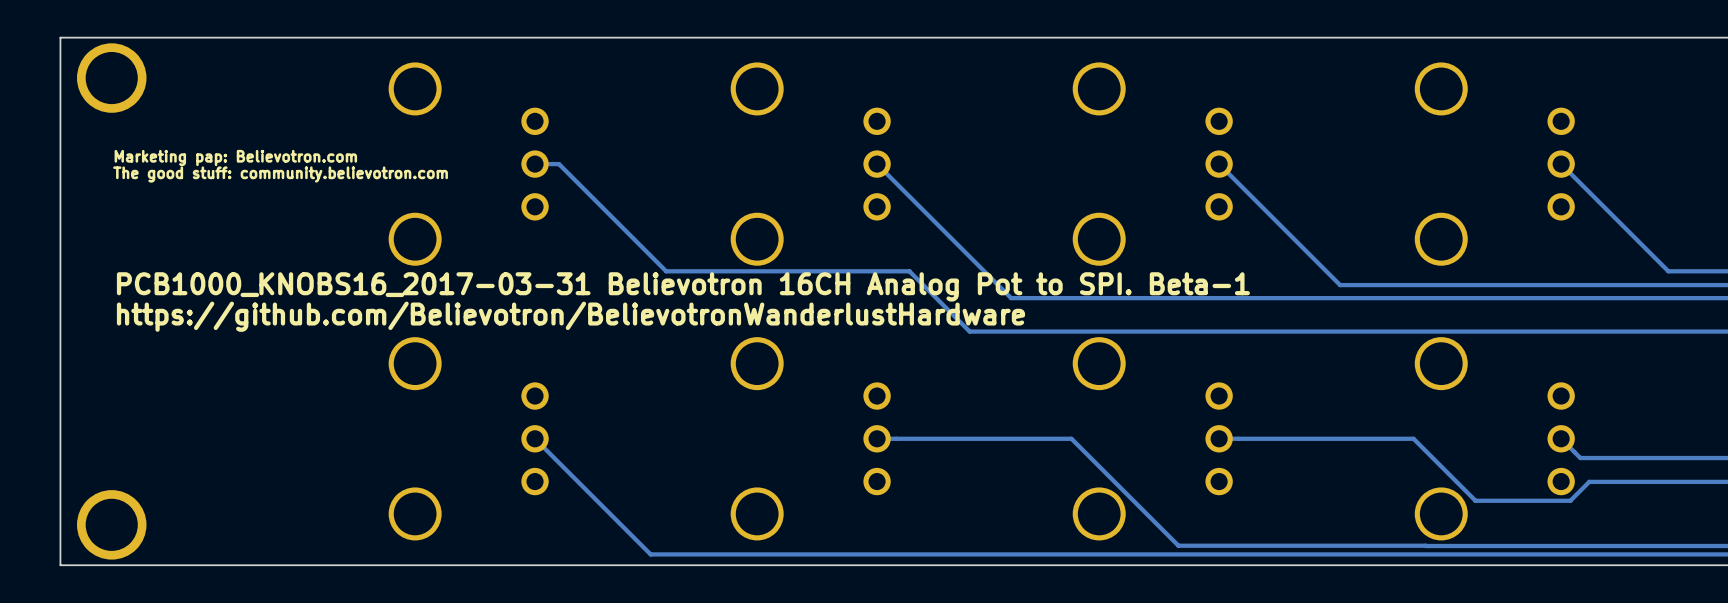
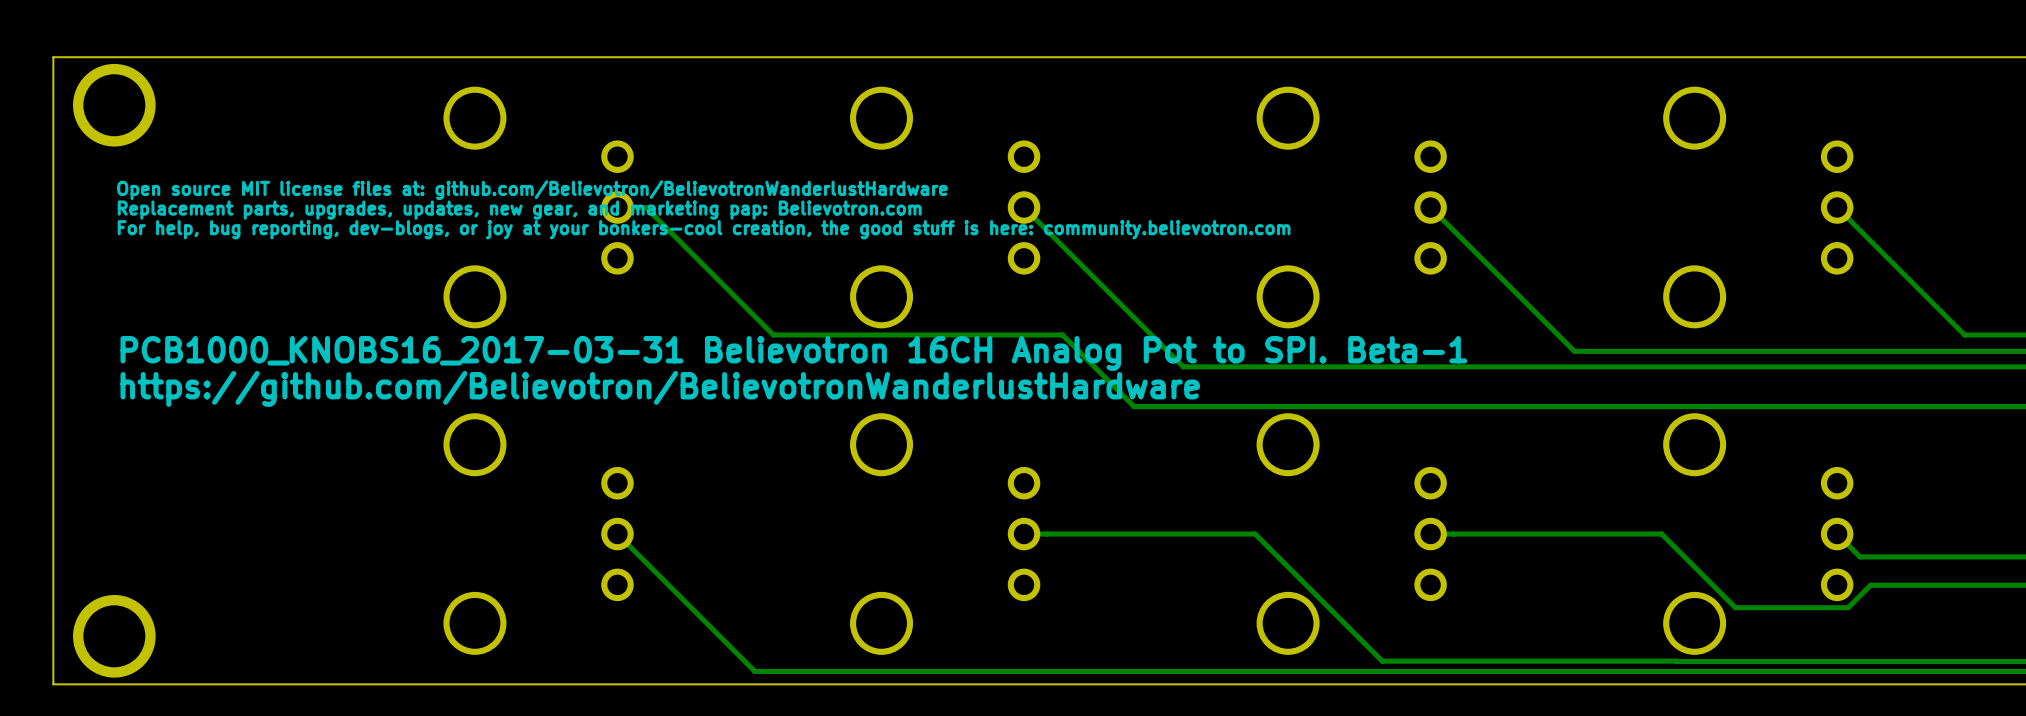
text: none -> Open source MIT license files at: github.com/Believotron/BelievotronWanderlustHardware (532, 190)
text: Marketing pap: Believotron.com (235, 157) -> none
text: none -> Replacement parts, upgrades, updates, new gear, and marketing pap: Believotron.com (519, 210)
text: The good stuff: community.believotron.com (280, 174) -> none
text: none -> For help, bug reporting, dev-blogs, or joy at your bonkers-cool creation, the good stuff is here: community.believotron.com (704, 229)

